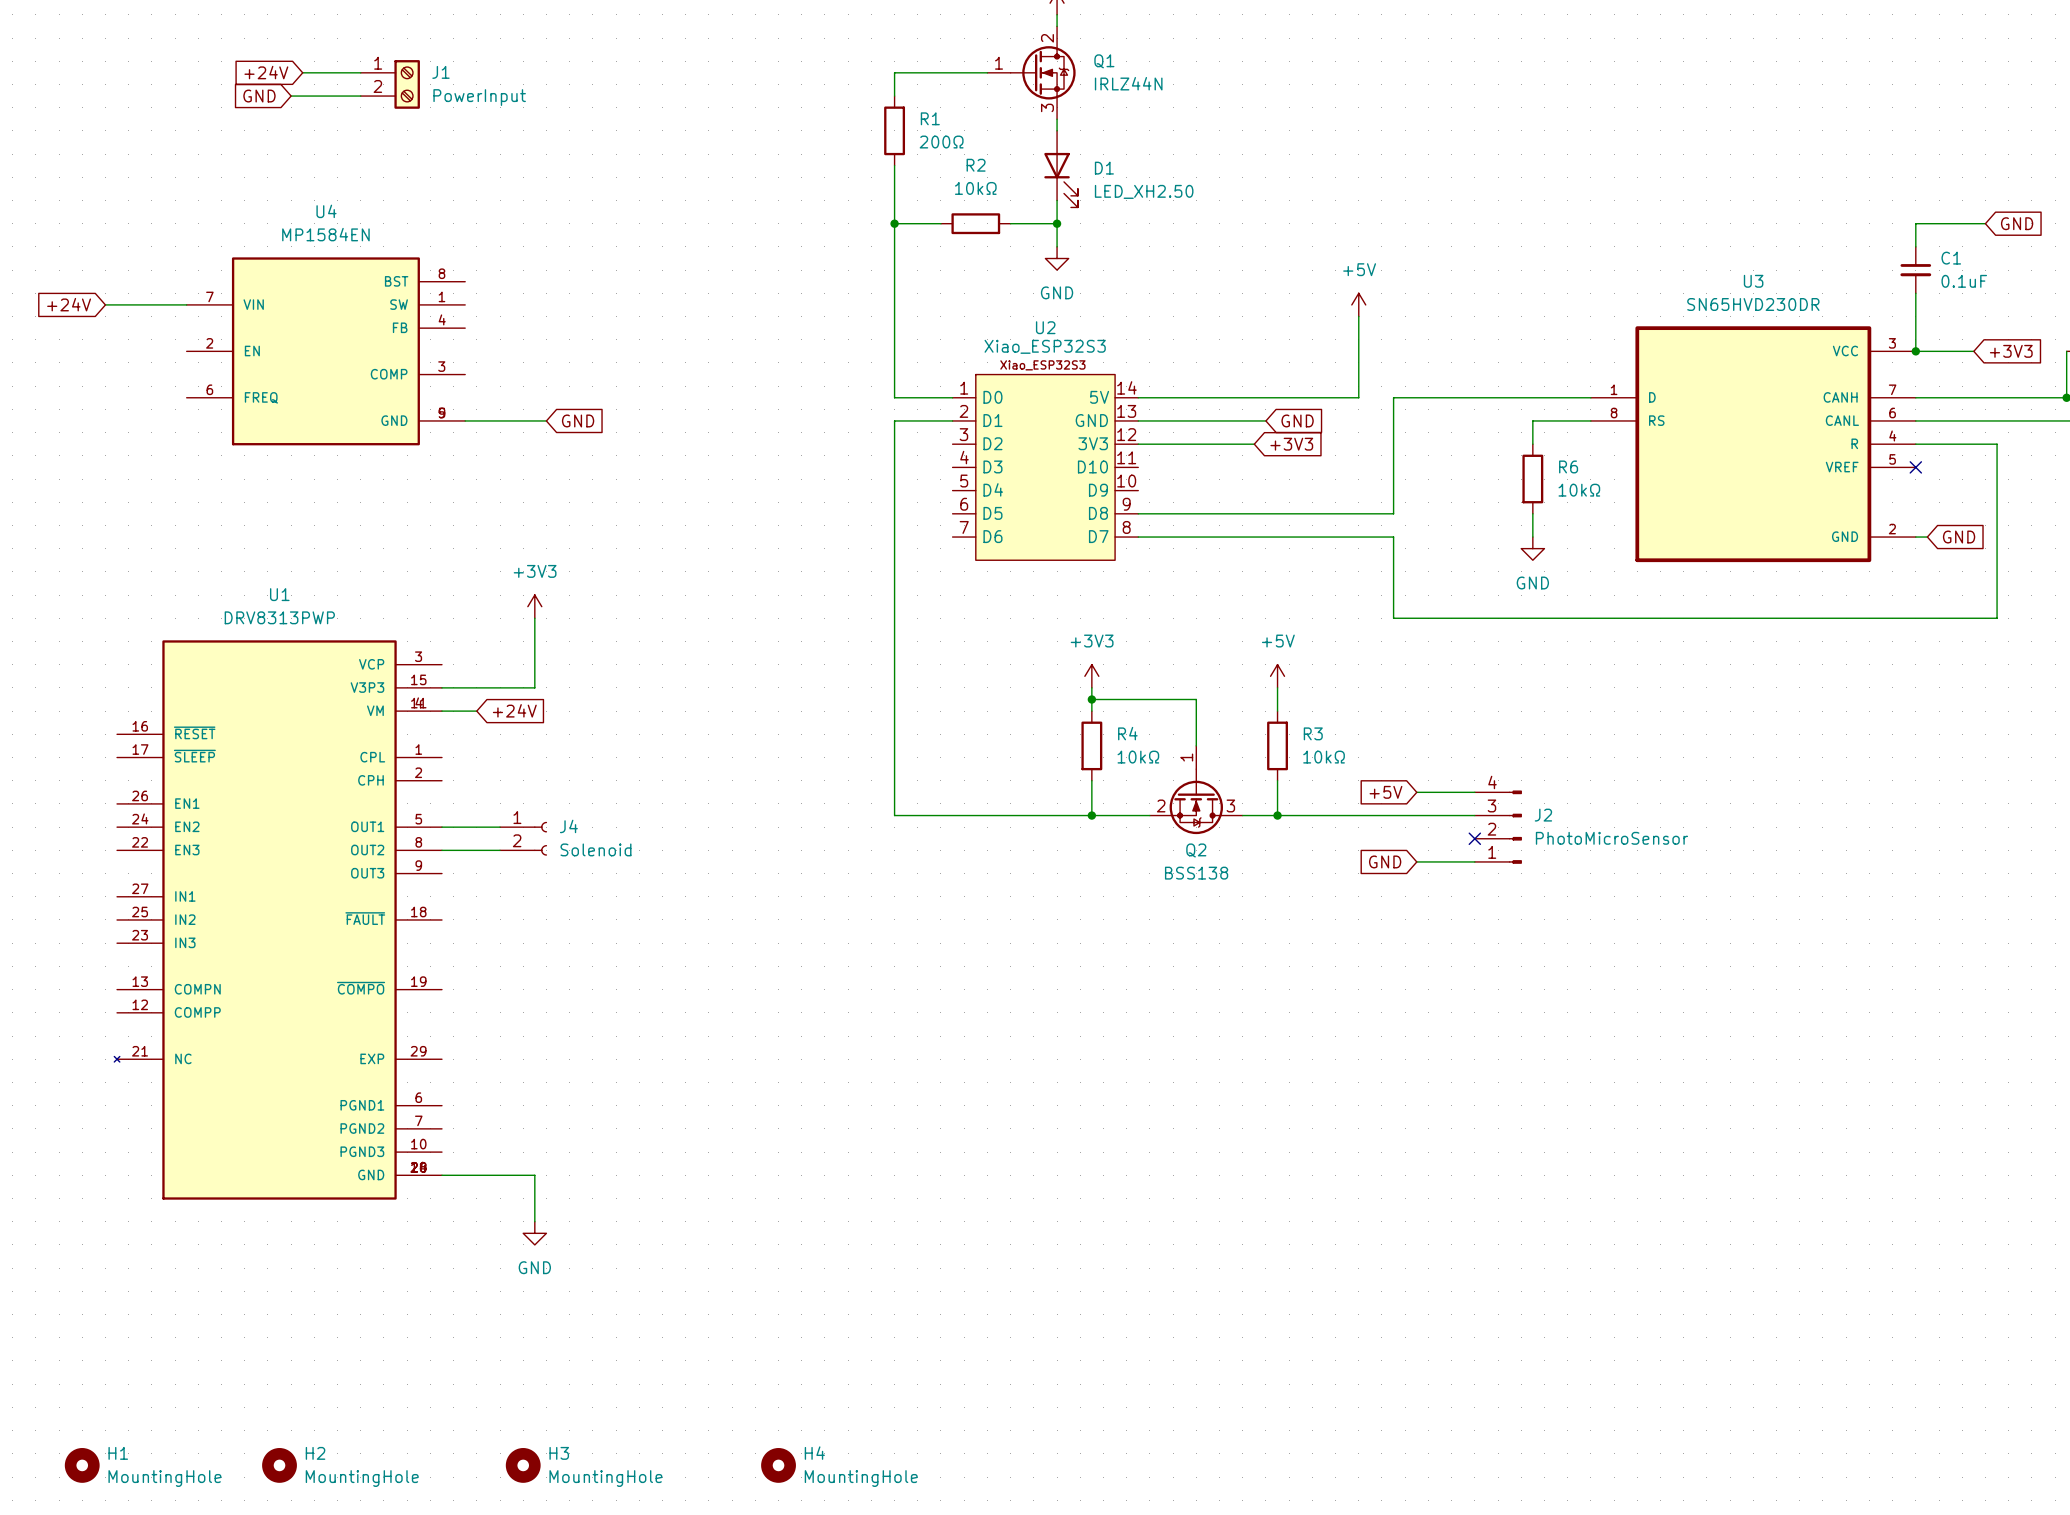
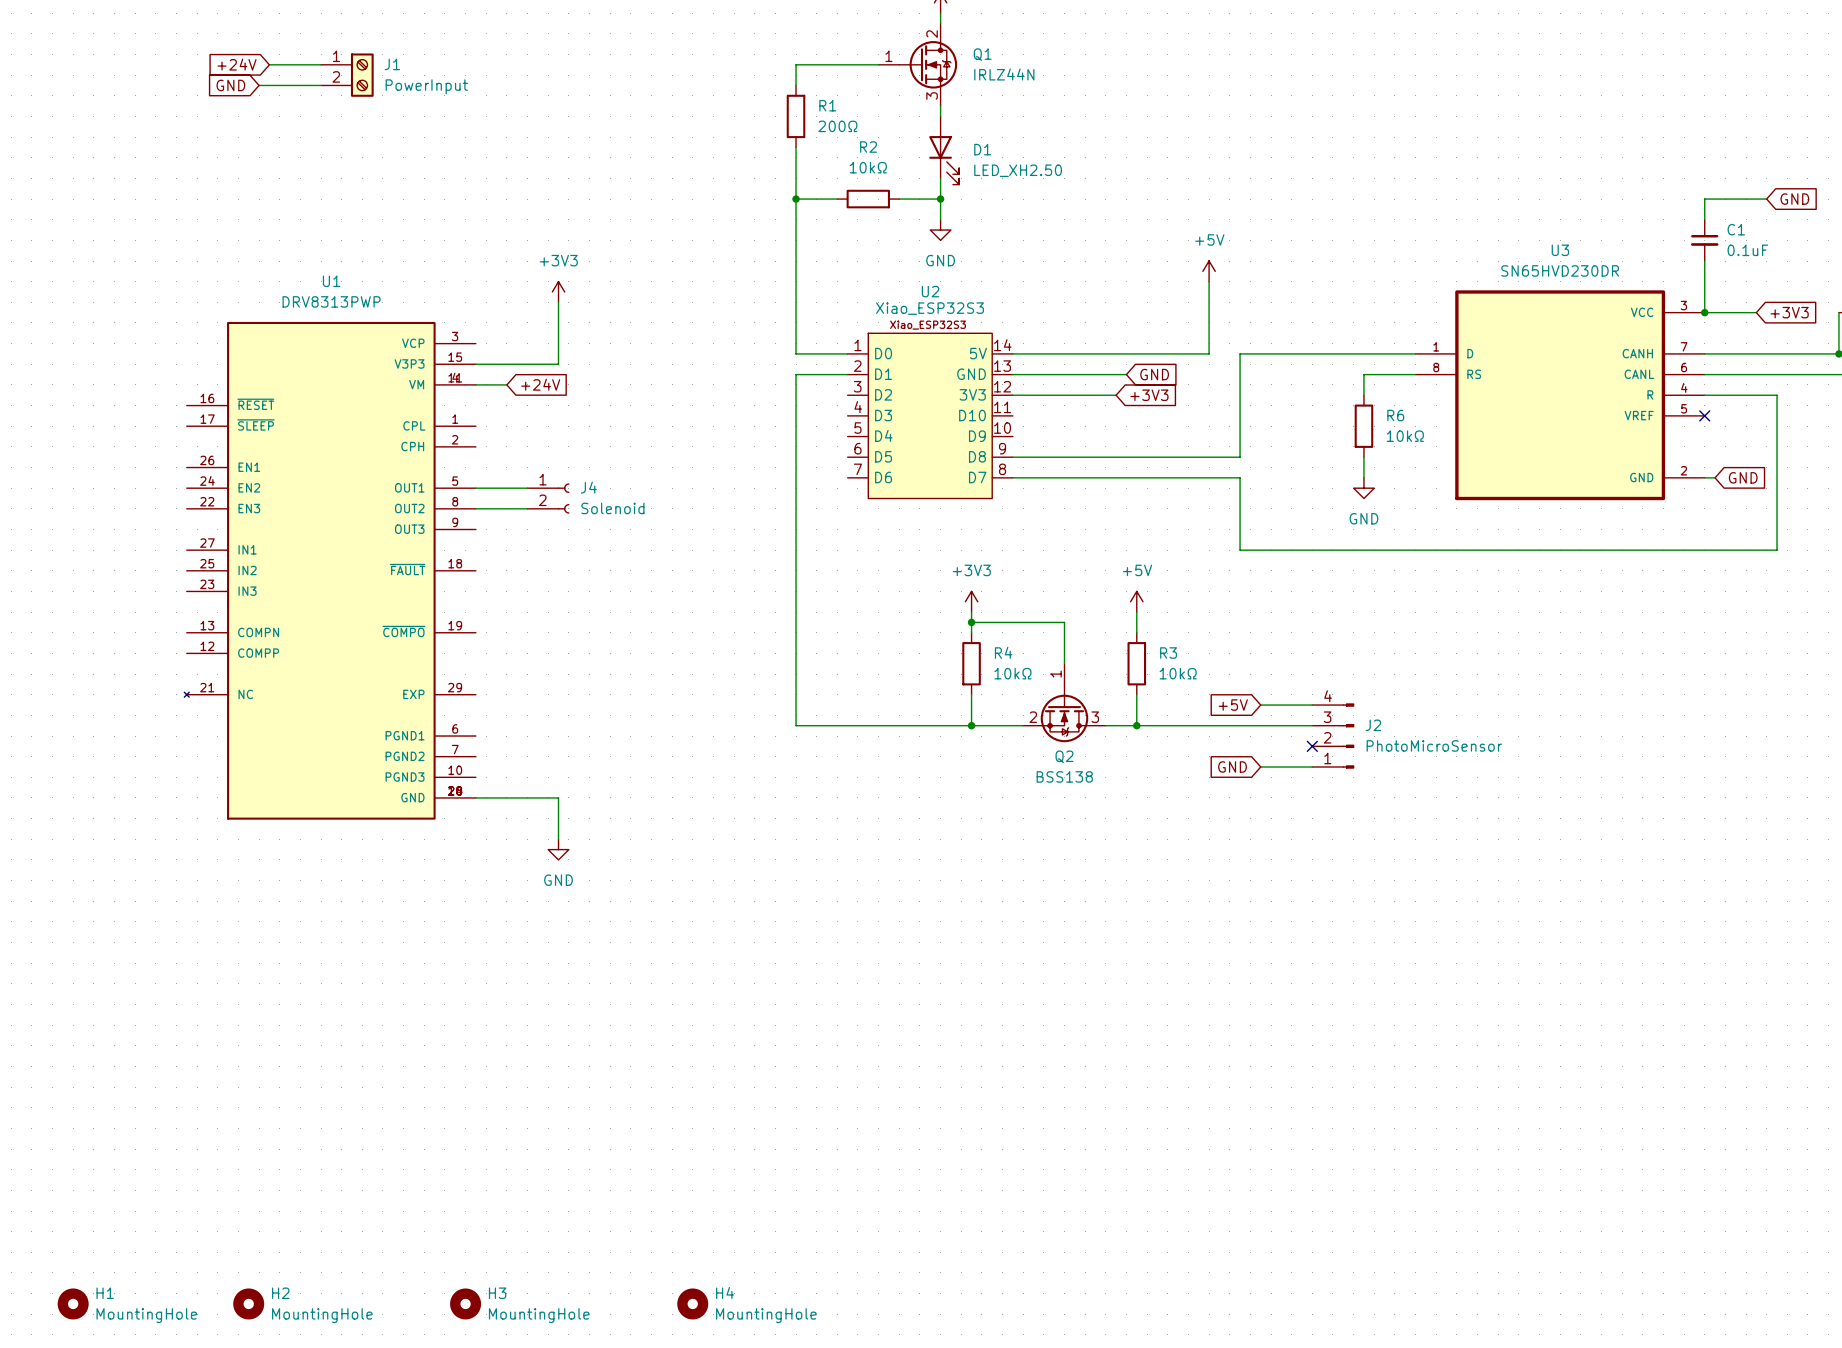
global label: +24V (69, 304) -> none
wire: (105, 304) (186, 304) -> none
power symbol: none -> +3V3 (558, 291)
wire: none -> (558, 302) (558, 364) (475, 364)
U4: MP1584EN (325, 351) -> none
wire: (465, 420) (546, 420) -> none
global label: GND (578, 420) -> none
wire: none -> (475, 384) (506, 384)
global label: none -> +24V (540, 384)
wire: none -> (475, 488) (527, 488)
wire: none -> (475, 508) (527, 508)
power symbol: +3V3 (534, 606) -> none
wire: (534, 618) (534, 687) (441, 687) -> none
global label: +24V (514, 710) -> none
J4 position: (523, 838) -> (548, 498)
wire: none -> (475, 797) (558, 797) (558, 839)
U1 position: (278, 919) -> (330, 570)
power symbol: none -> GND (558, 849)
wire: (441, 1175) (534, 1175) (534, 1221) -> none
power symbol: GND (534, 1233) -> none

